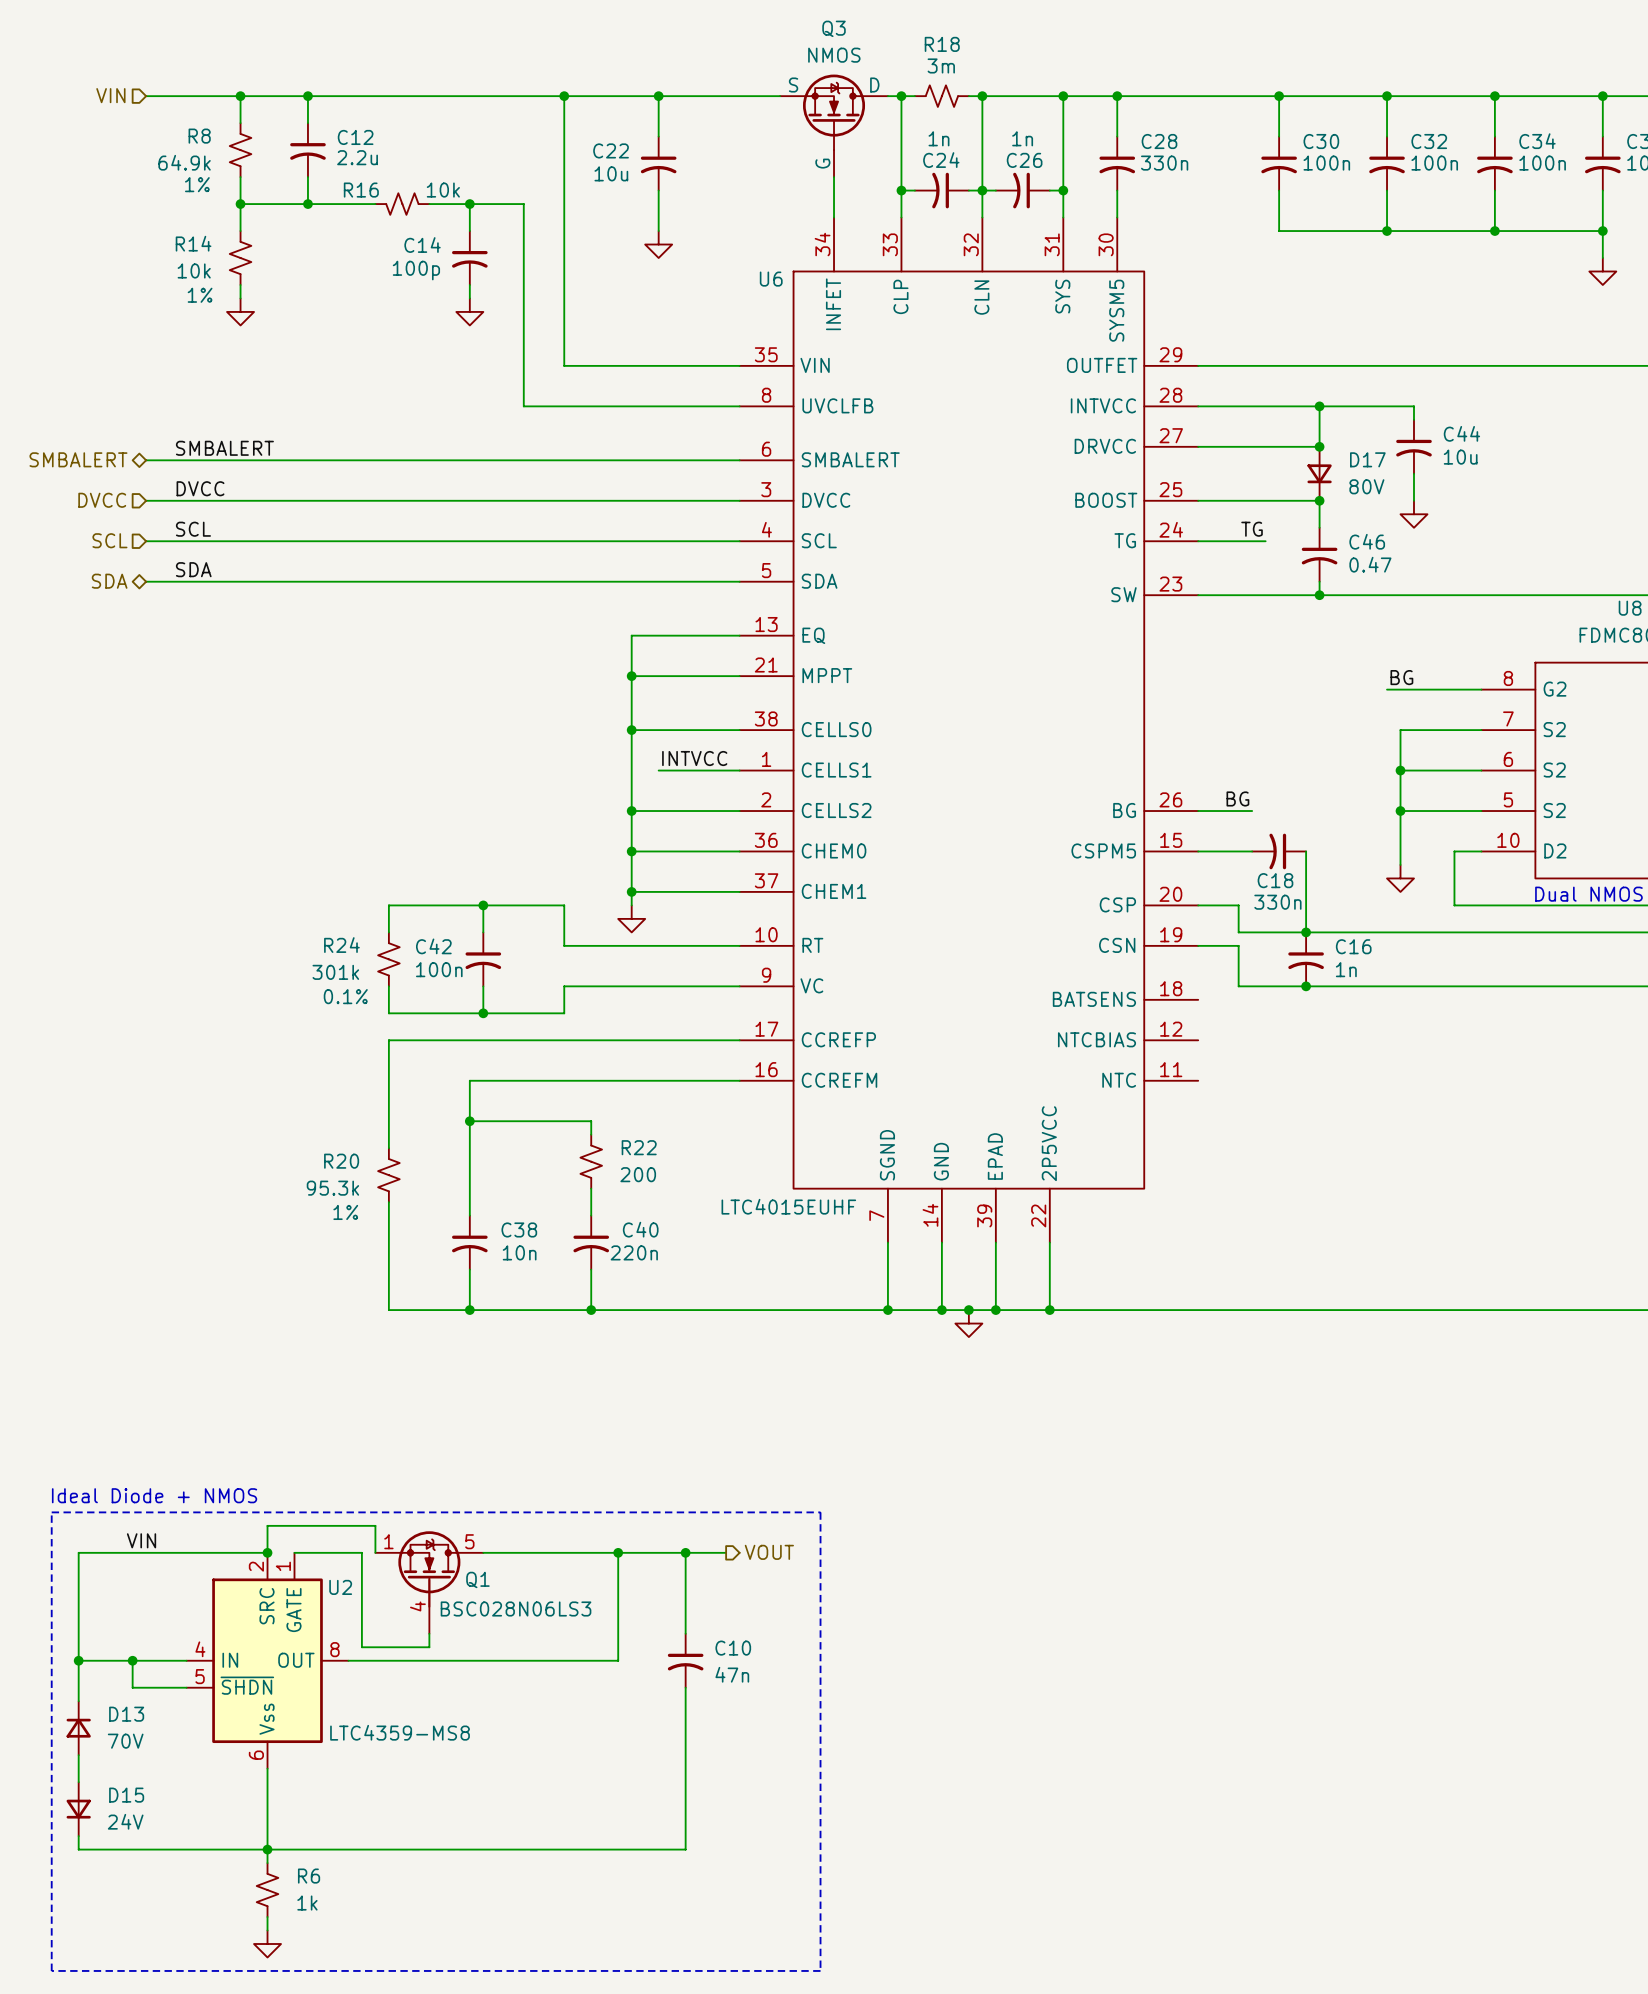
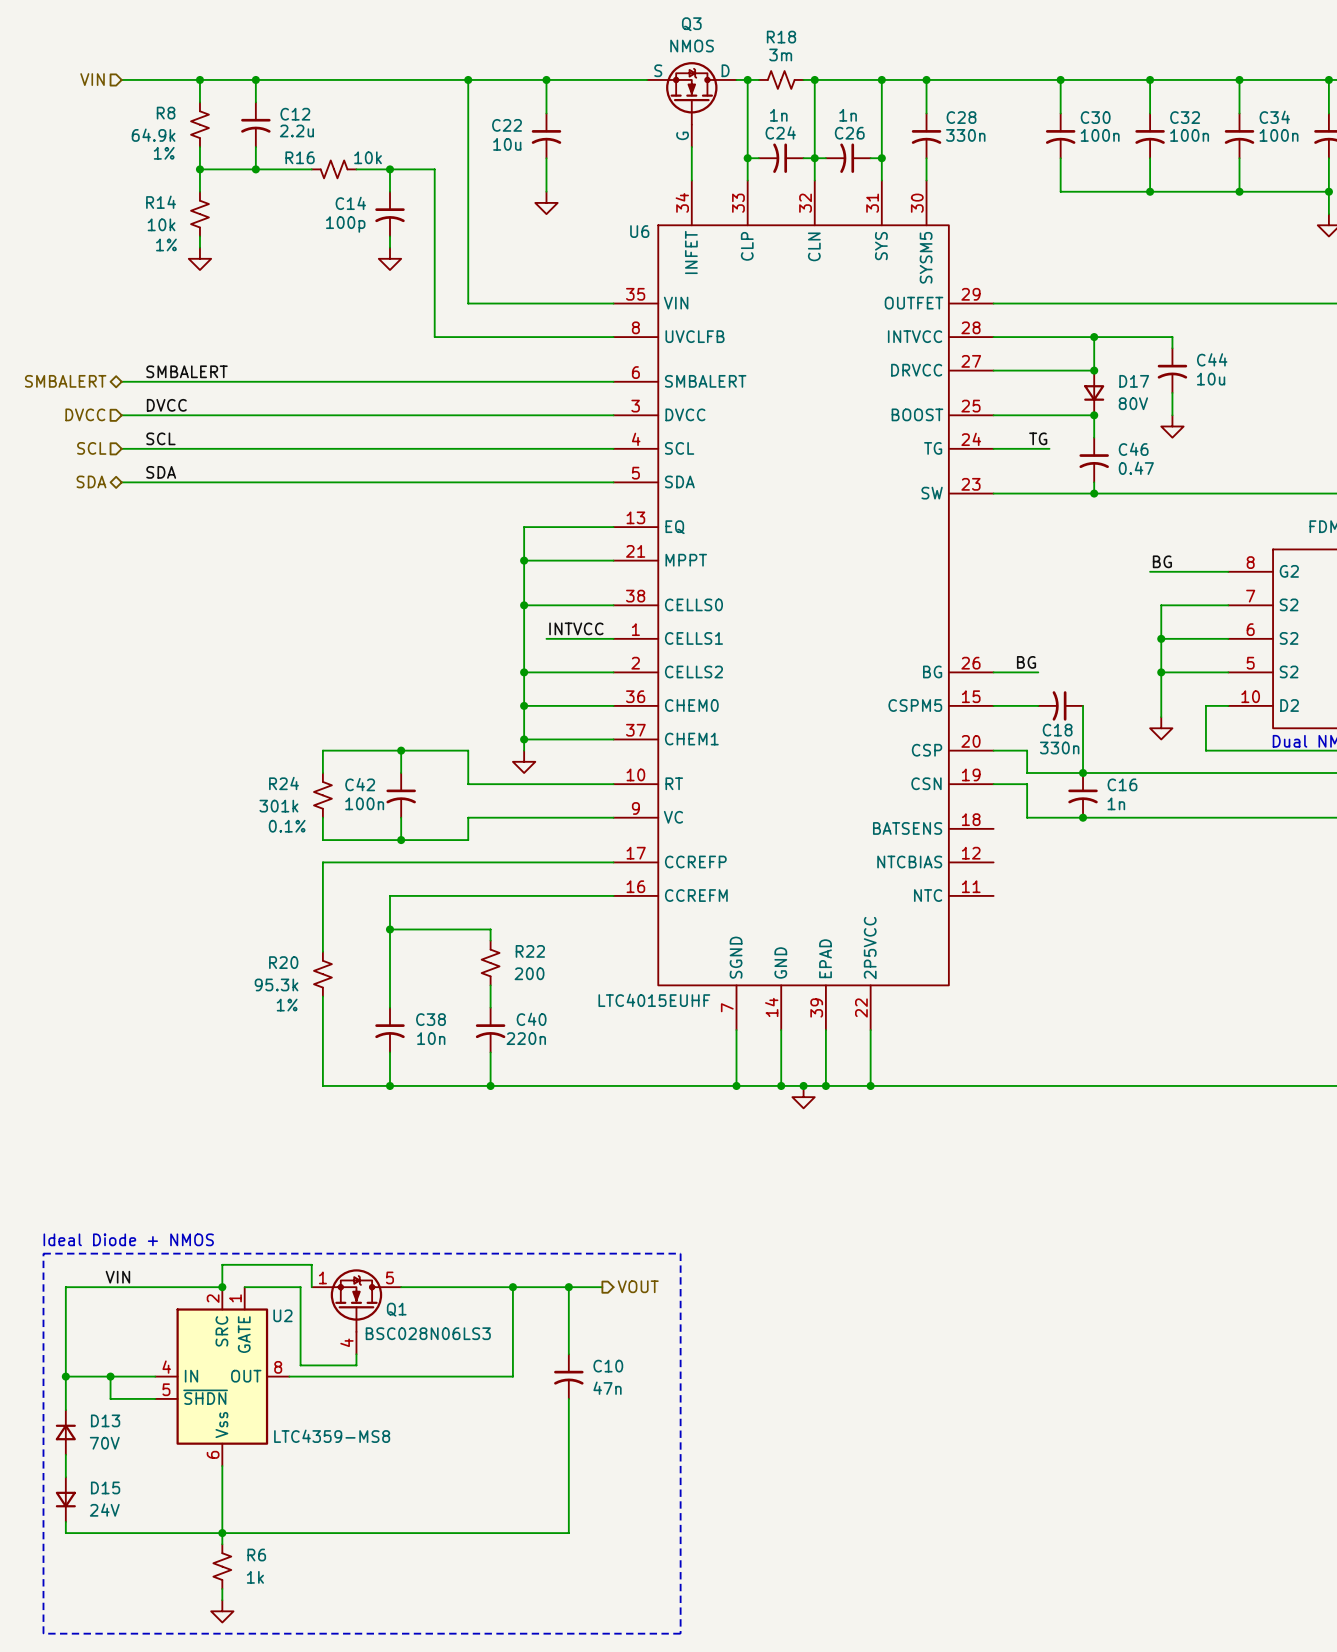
Q1 symbol: [375, 1531, 484, 1634] -> [311, 1269, 402, 1355]

